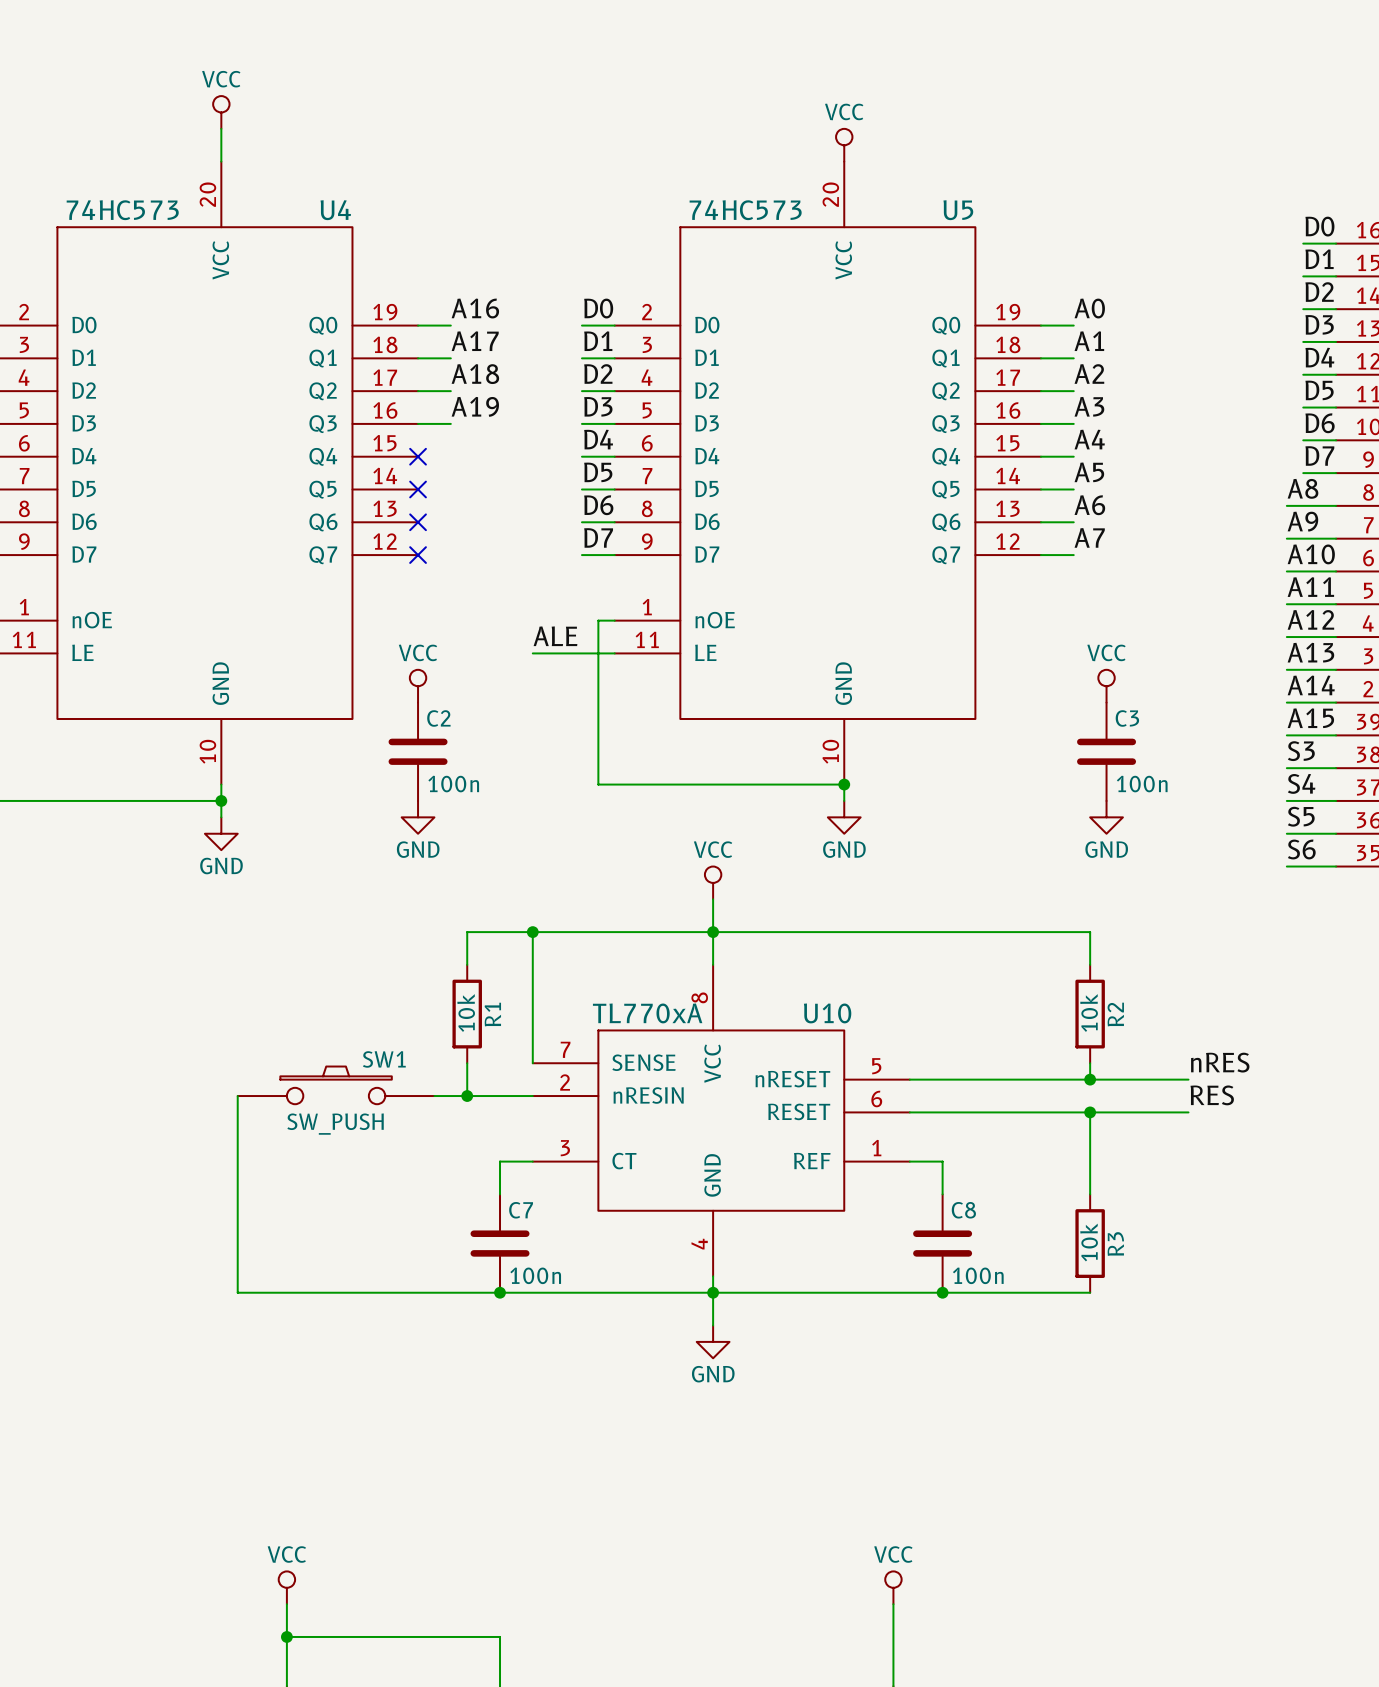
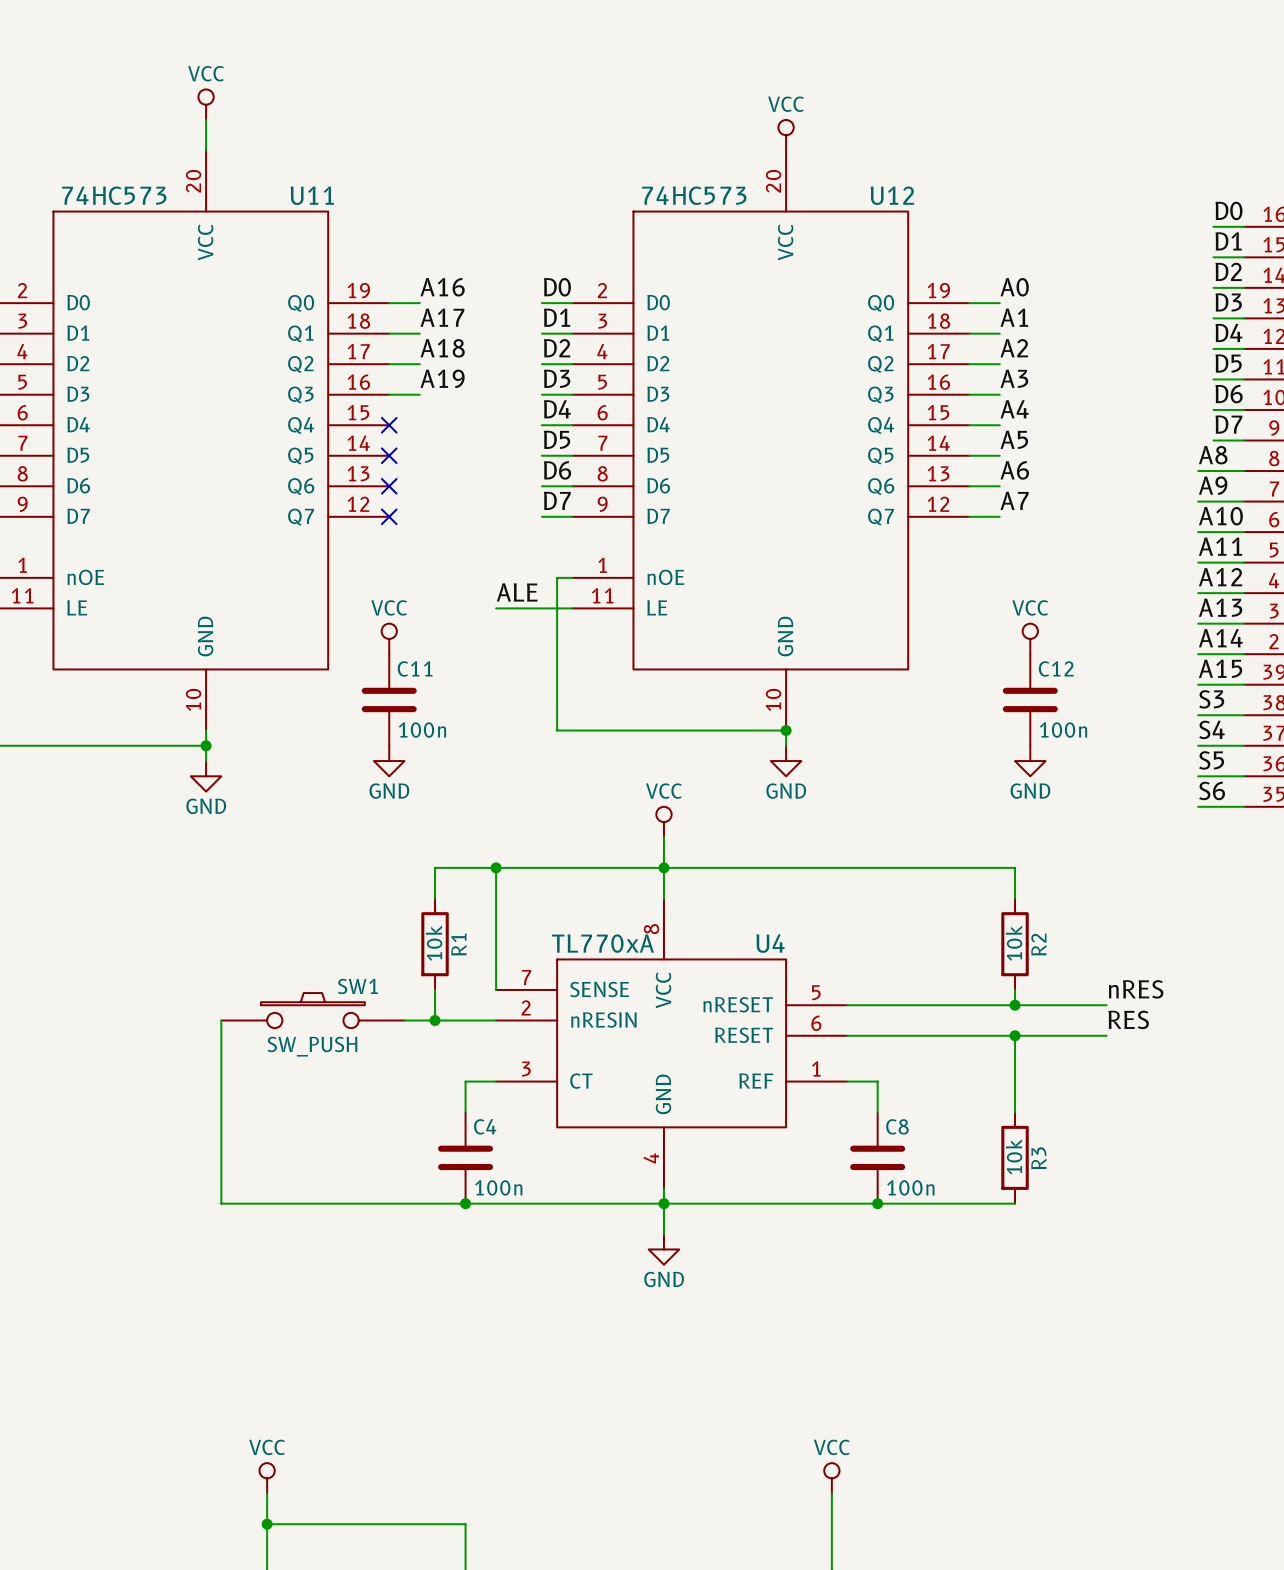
U4 name: U4 (335, 210) -> U11 (312, 195)
U5 name: U5 (958, 210) -> U12 (892, 195)
C2 name: C2 (438, 718) -> C11 (415, 668)
C3 name: C3 (1127, 718) -> C12 (1056, 668)
U10 name: U10 (827, 1013) -> U4 (770, 943)
C7 name: C7 (521, 1210) -> C4 (485, 1126)

